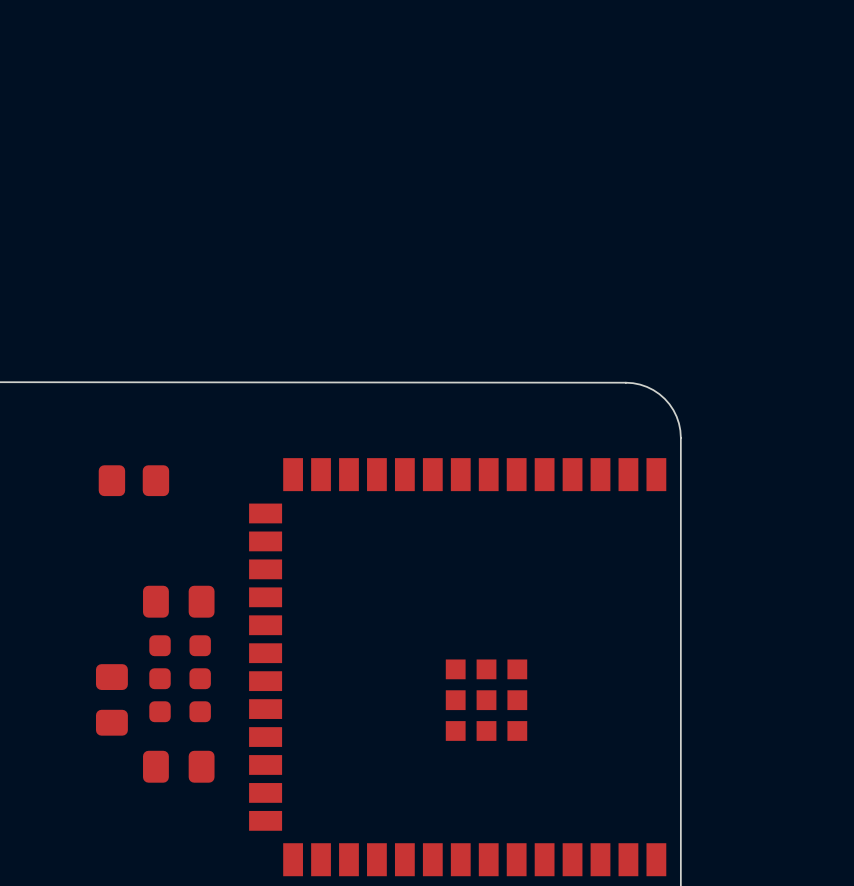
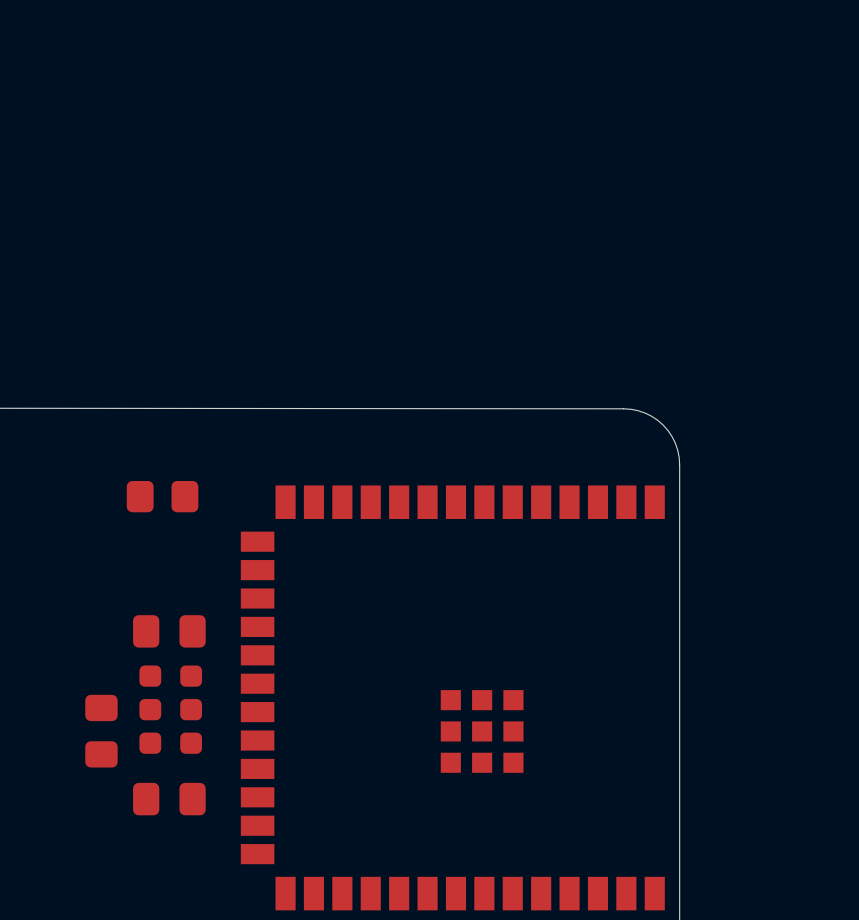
part position: (133, 480) -> (162, 496)

